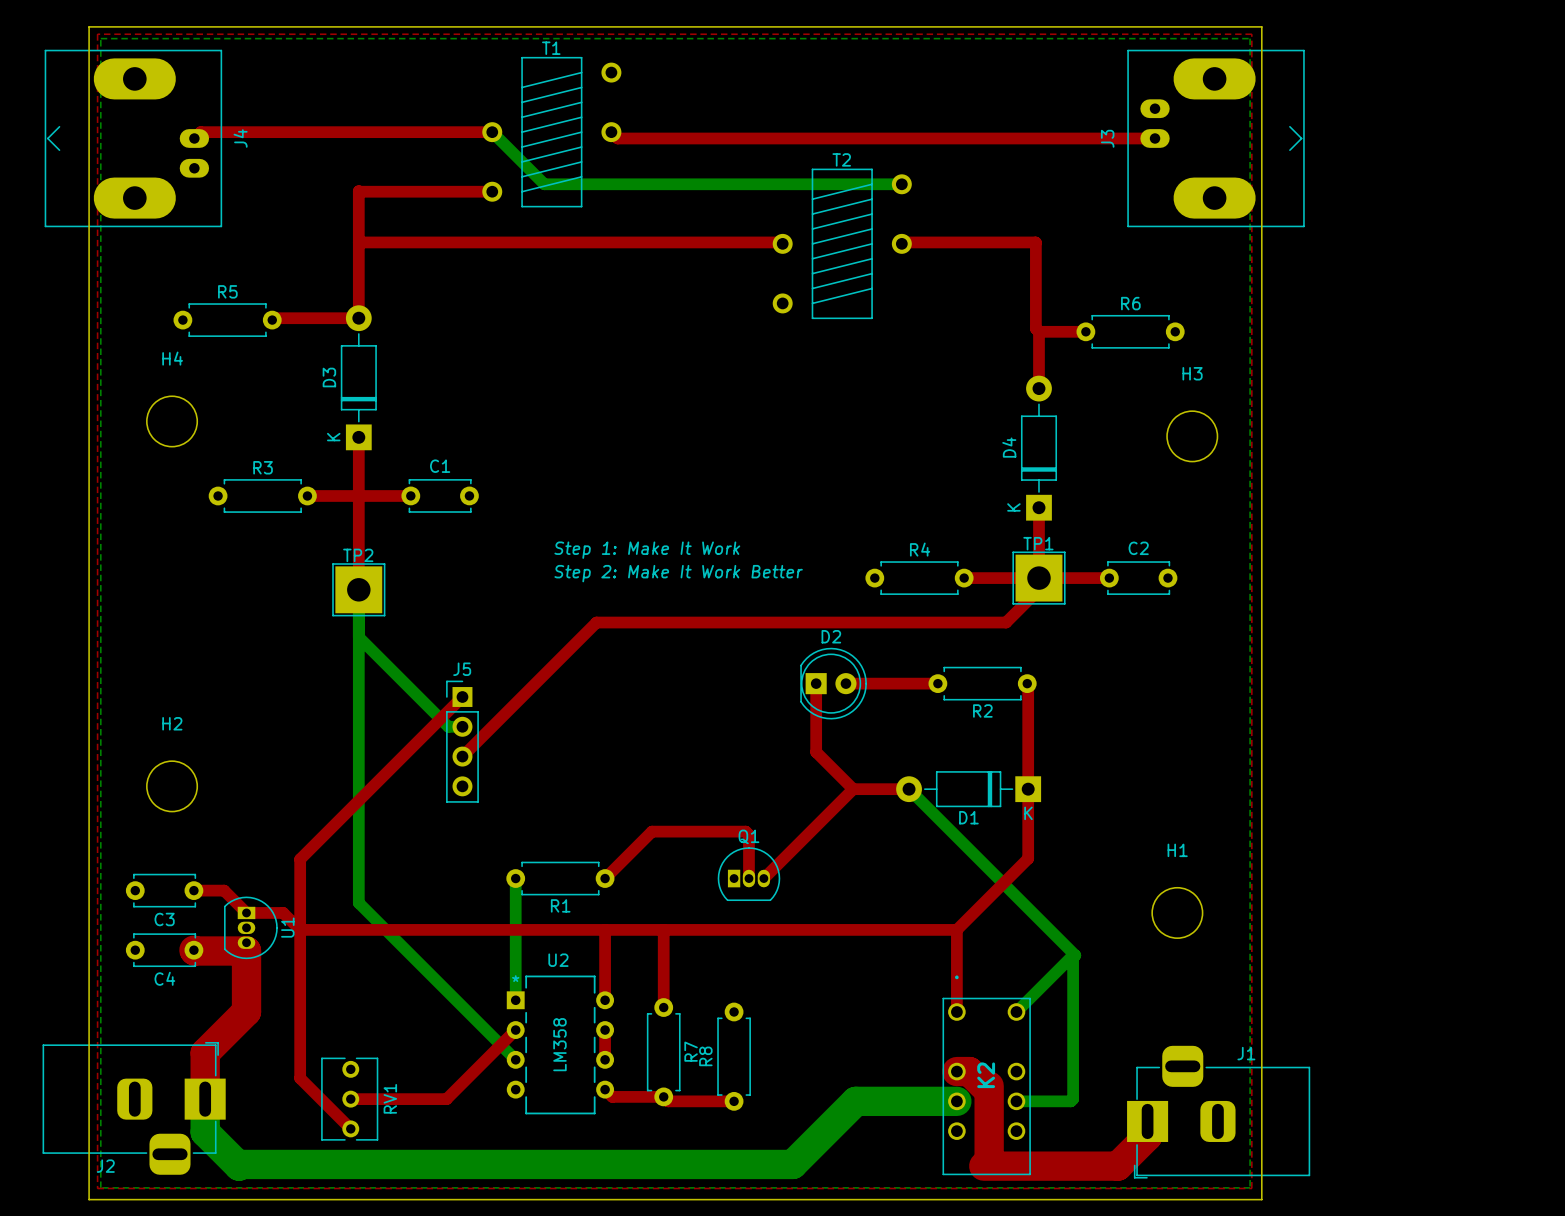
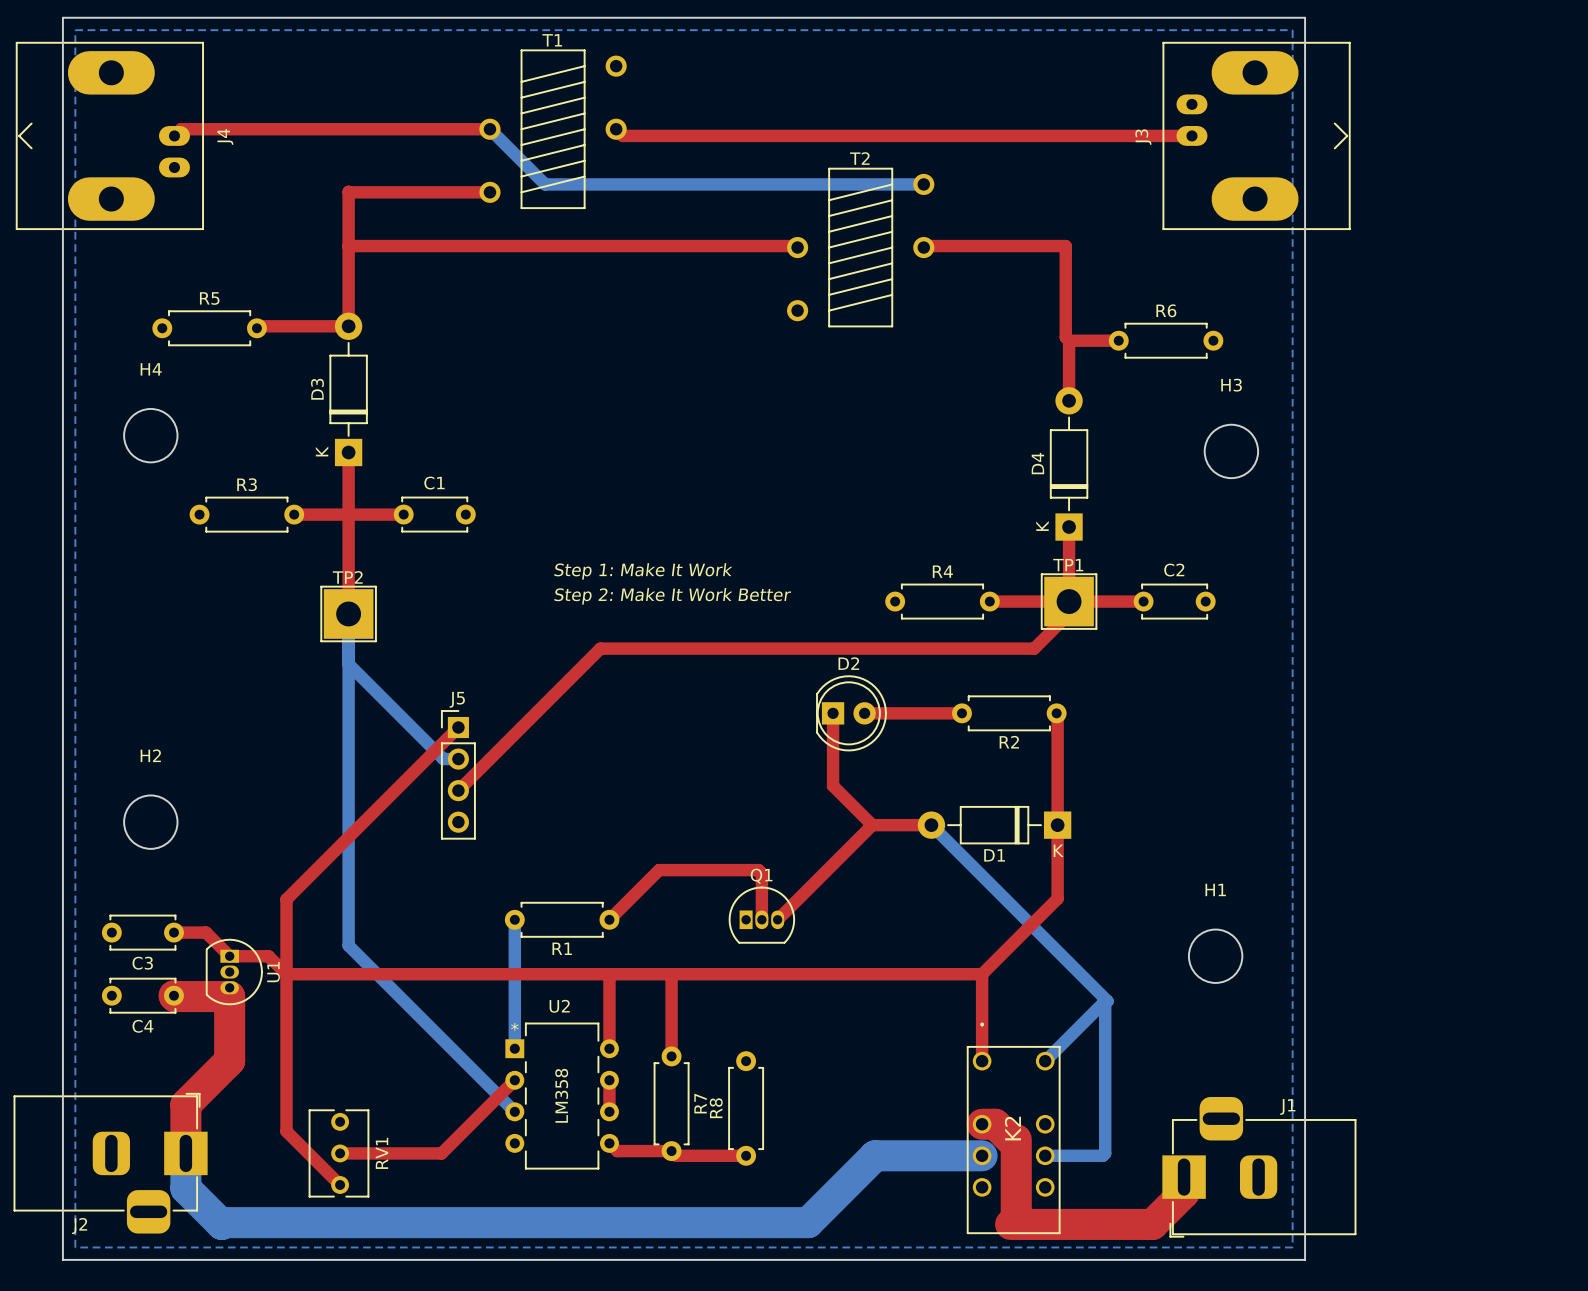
top zone outline: (97, 34) (97, 1188) (1251, 1188) (1251, 34) (97, 34) -> none

